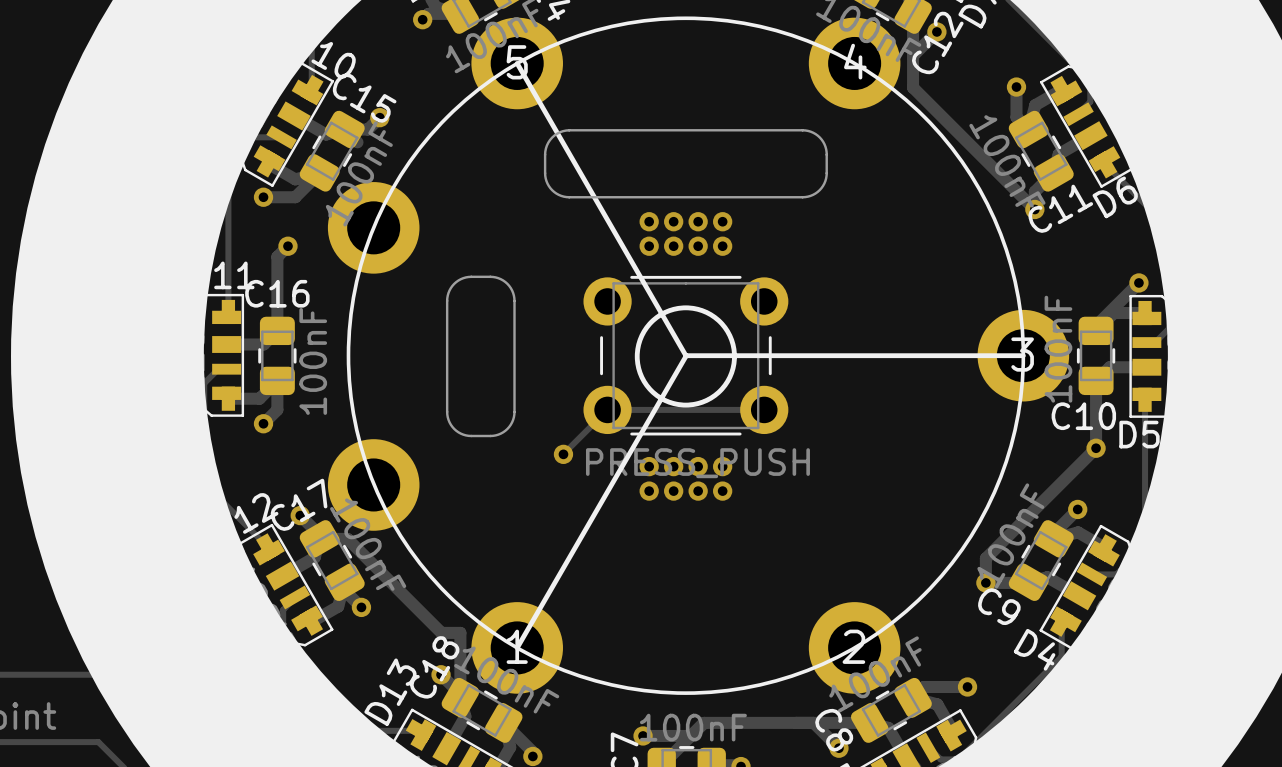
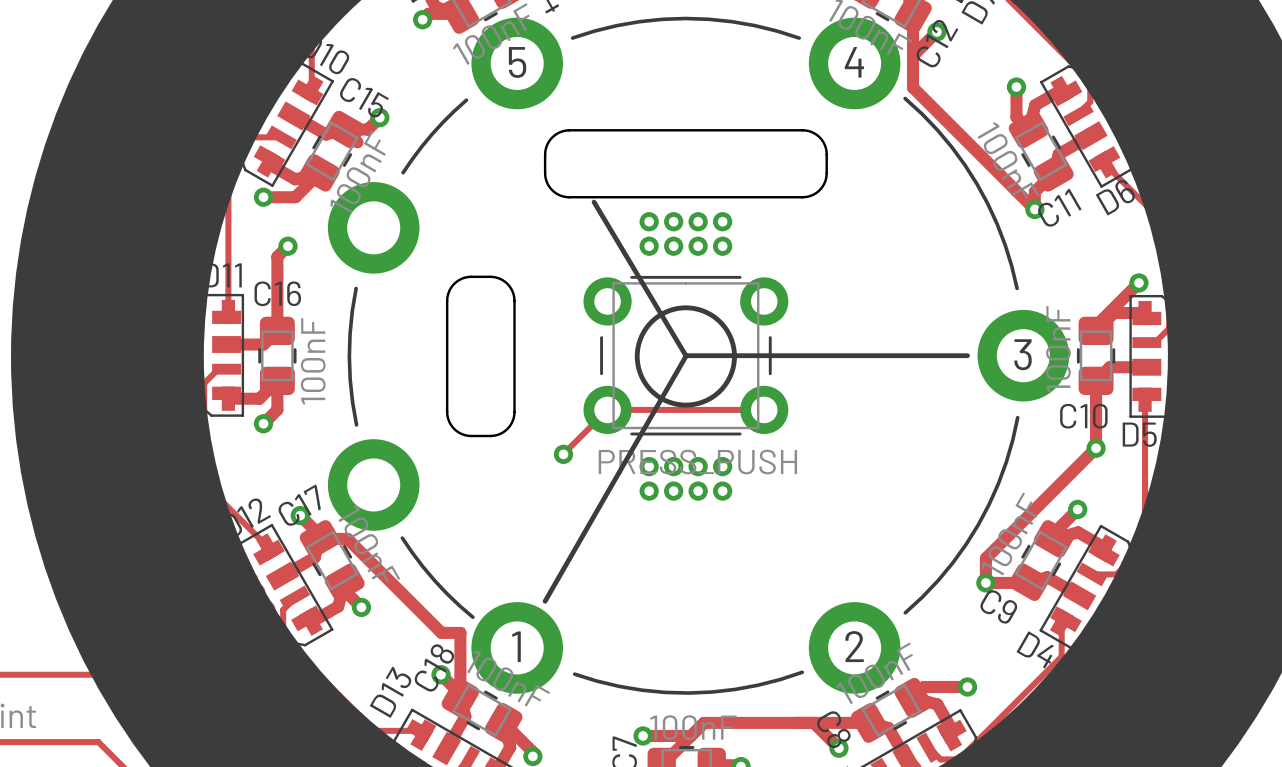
drawing: [346, 16, 1026, 695] -> none
line: none -> (572, 38) (617, 25) (639, 21) (685, 18) (708, 19) (754, 25) (799, 38)
line: (517, 63) (685, 355) -> (594, 202) (685, 355)
line: none -> (905, 98) (937, 129) (977, 184) (997, 224) (1017, 288)
line: none -> (466, 100) (432, 134) (403, 172)
line: none -> (356, 288) (350, 333) (349, 356) (352, 402) (356, 424)
line: (967, 355) (1023, 355) -> none
line: (685, 356) (517, 647) -> (685, 356) (545, 601)
line: none -> (1017, 417) (1006, 462) (989, 504) (978, 524) (966, 544) (938, 580) (905, 612)
line: none -> (402, 538) (434, 580) (472, 617)
line: none -> (802, 672) (780, 679) (734, 689) (688, 693) (665, 692) (619, 686) (574, 674)

